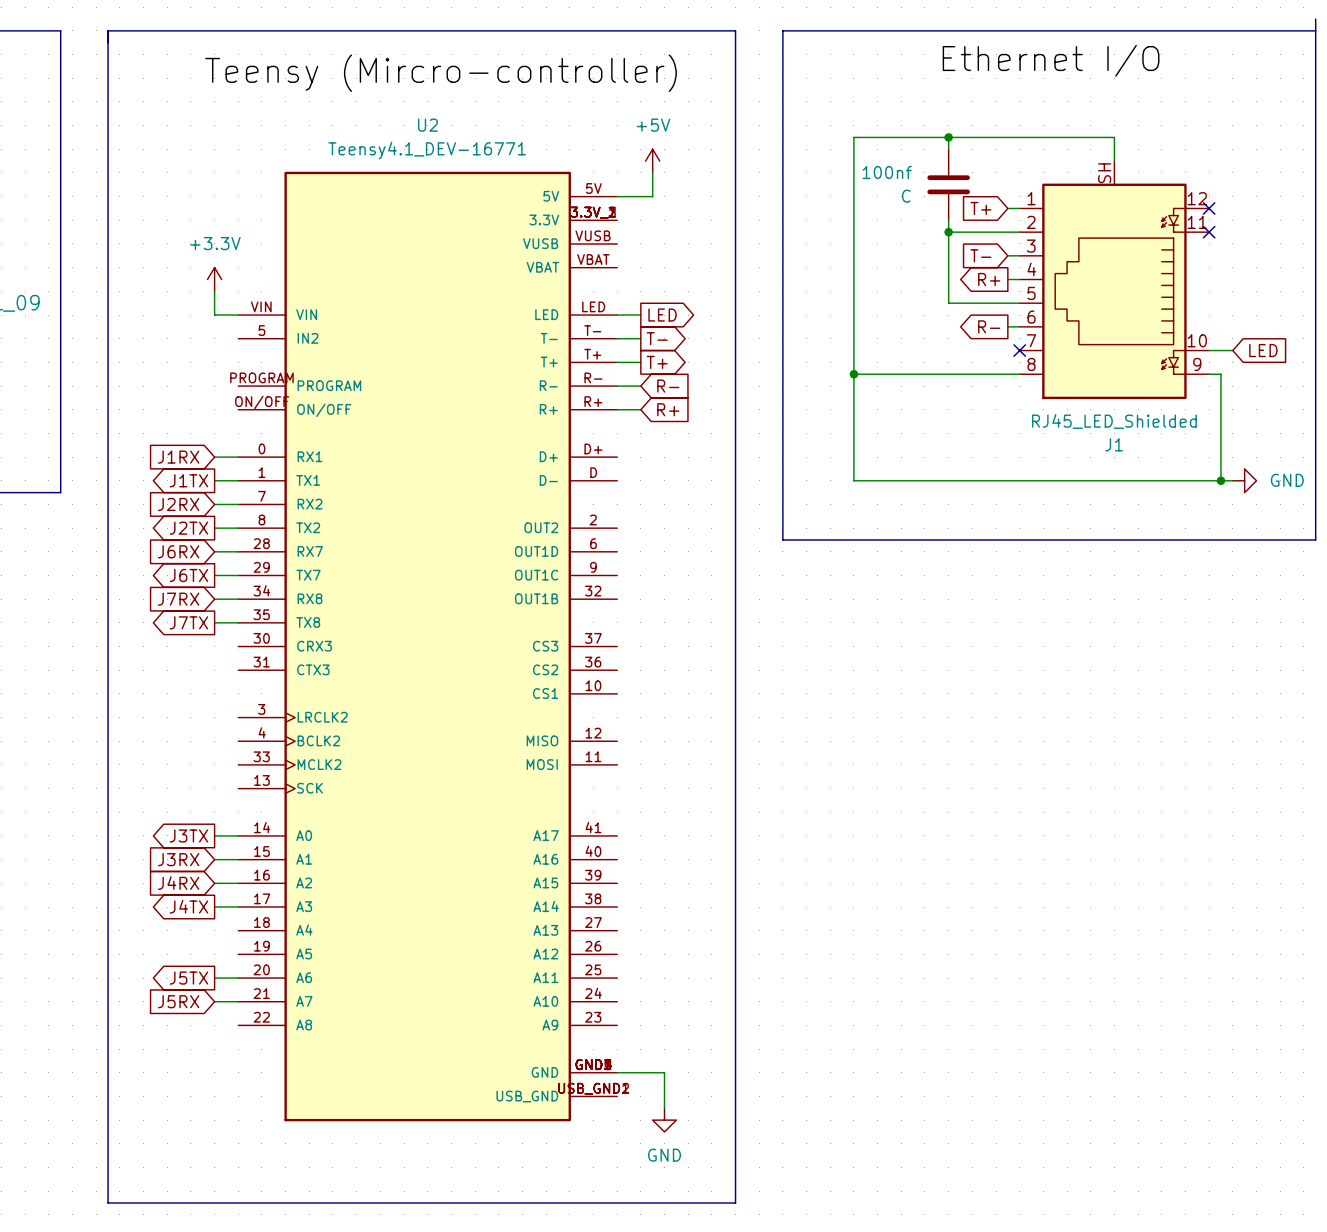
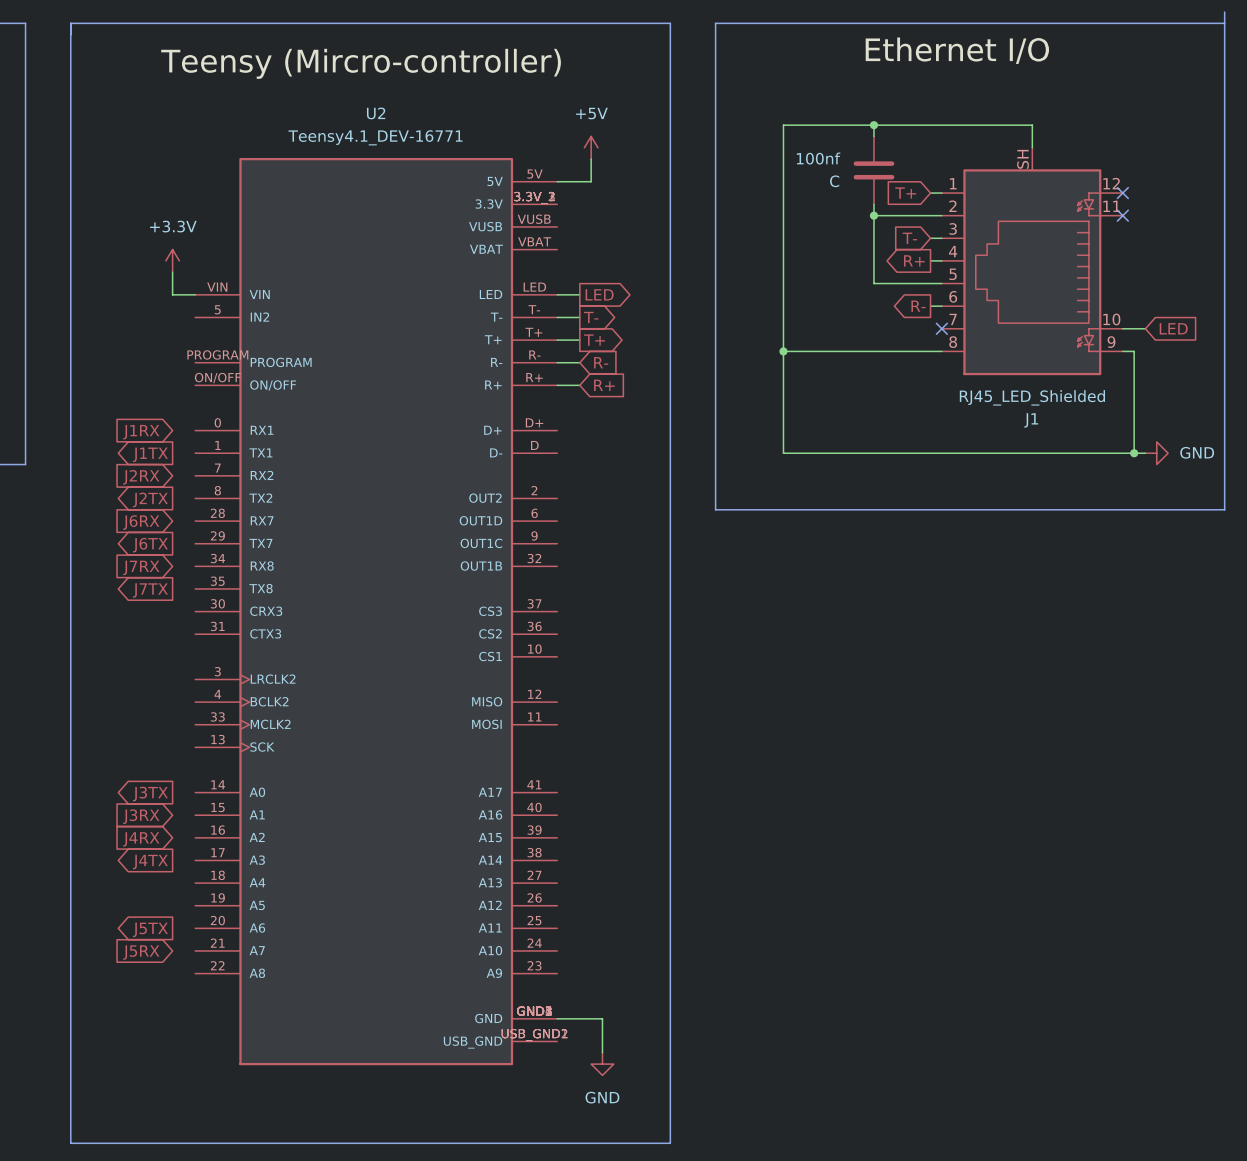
wire: (214, 457) (238, 457) -> none
wire: (214, 480) (238, 480) -> none
wire: (214, 504) (238, 504) -> none
wire: (214, 528) (238, 528) -> none
wire: (214, 551) (238, 551) -> none
wire: (214, 575) (238, 575) -> none
wire: (214, 599) (238, 599) -> none
wire: (214, 622) (238, 622) -> none
wire: (214, 835) (238, 835) -> none
wire: (214, 859) (238, 859) -> none
wire: (214, 883) (238, 883) -> none
wire: (214, 907) (238, 907) -> none
wire: (214, 978) (238, 978) -> none
wire: (214, 1001) (238, 1001) -> none

